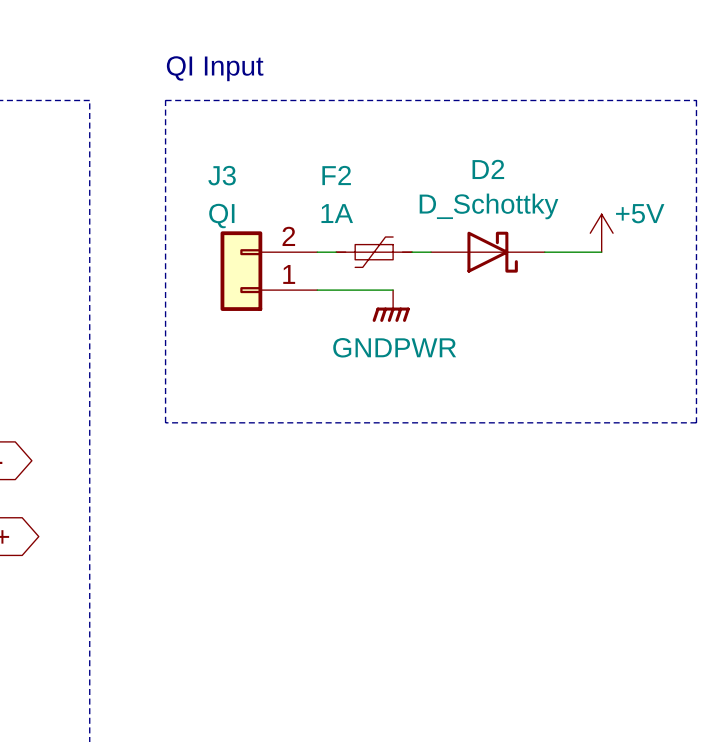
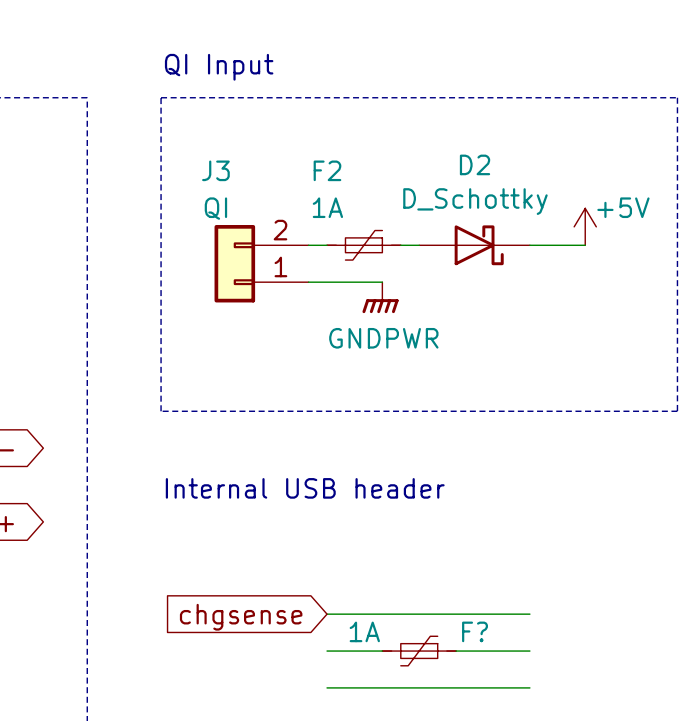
text: none -> Internal USB header (305, 488)
wire: none -> (327, 614) (529, 614)
global label: none -> chgsense (241, 617)
wire: none -> (327, 651) (382, 651)
F?: none -> 1A (419, 651)
wire: none -> (456, 651) (529, 651)
wire: none -> (327, 687) (529, 687)

